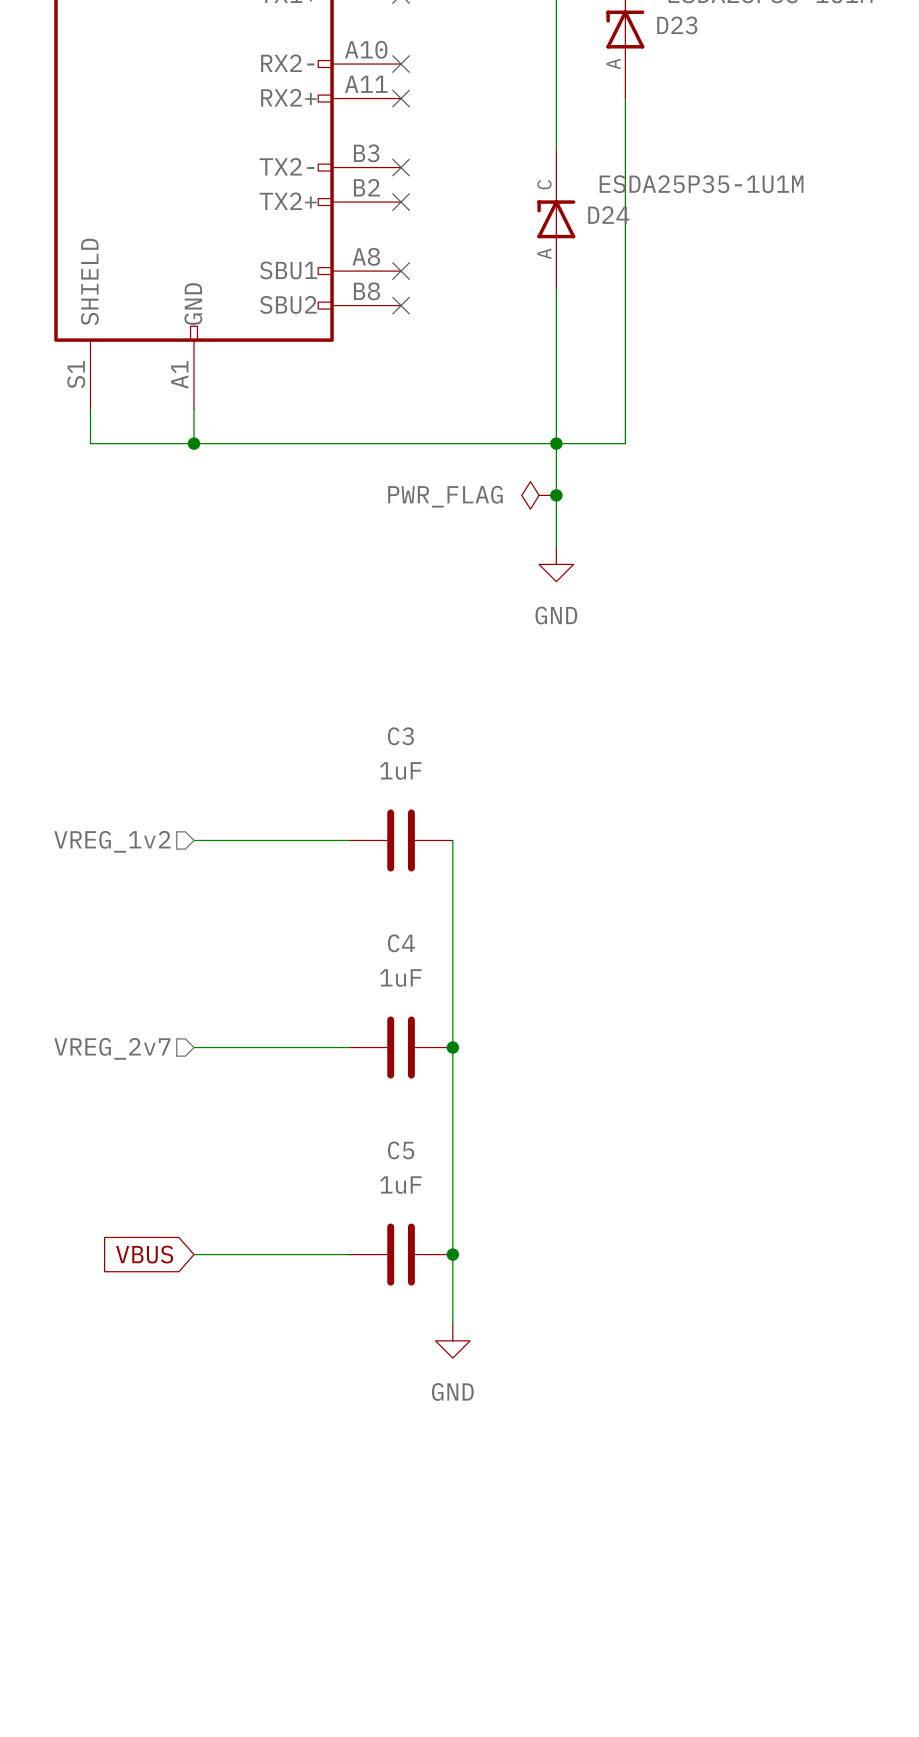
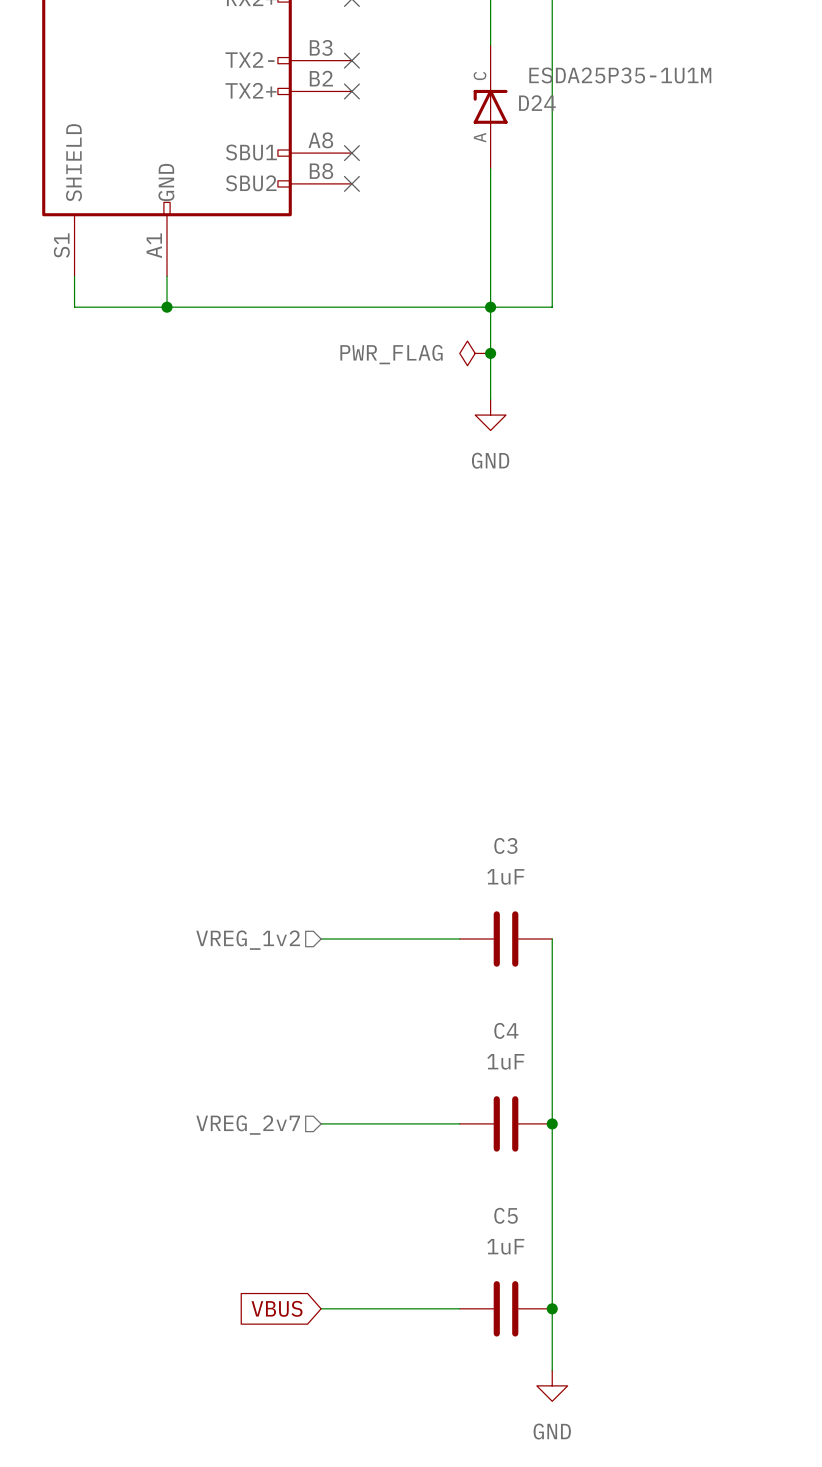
wire: (194, 840) (349, 840) -> none
C3 position: (401, 840) -> (506, 939)
wire: (452, 840) (452, 1323) -> none
hierarchical label: VREG_1v2 (112, 841) -> none
wire: (194, 1047) (349, 1047) -> (321, 939) (459, 939)
C4 position: (401, 1047) -> (506, 1123)
junction: (452, 1047) -> none
hierarchical label: VREG_2v7 (112, 1048) -> none
wire: none -> (552, 939) (552, 1370)
hierarchical label: none -> VREG_1v2 (248, 940)
global label: VBUS (144, 1254) -> none
wire: (194, 1254) (349, 1254) -> (321, 1123) (459, 1123)
C5 position: (401, 1254) -> (506, 1308)
junction: (452, 1254) -> none
power symbol: GND (452, 1340) -> none
junction: none -> (552, 1123)
hierarchical label: none -> VREG_2v7 (248, 1125)
global label: none -> VBUS (277, 1308)
wire: none -> (321, 1308) (459, 1308)
junction: none -> (552, 1308)
power symbol: none -> GND (552, 1385)

